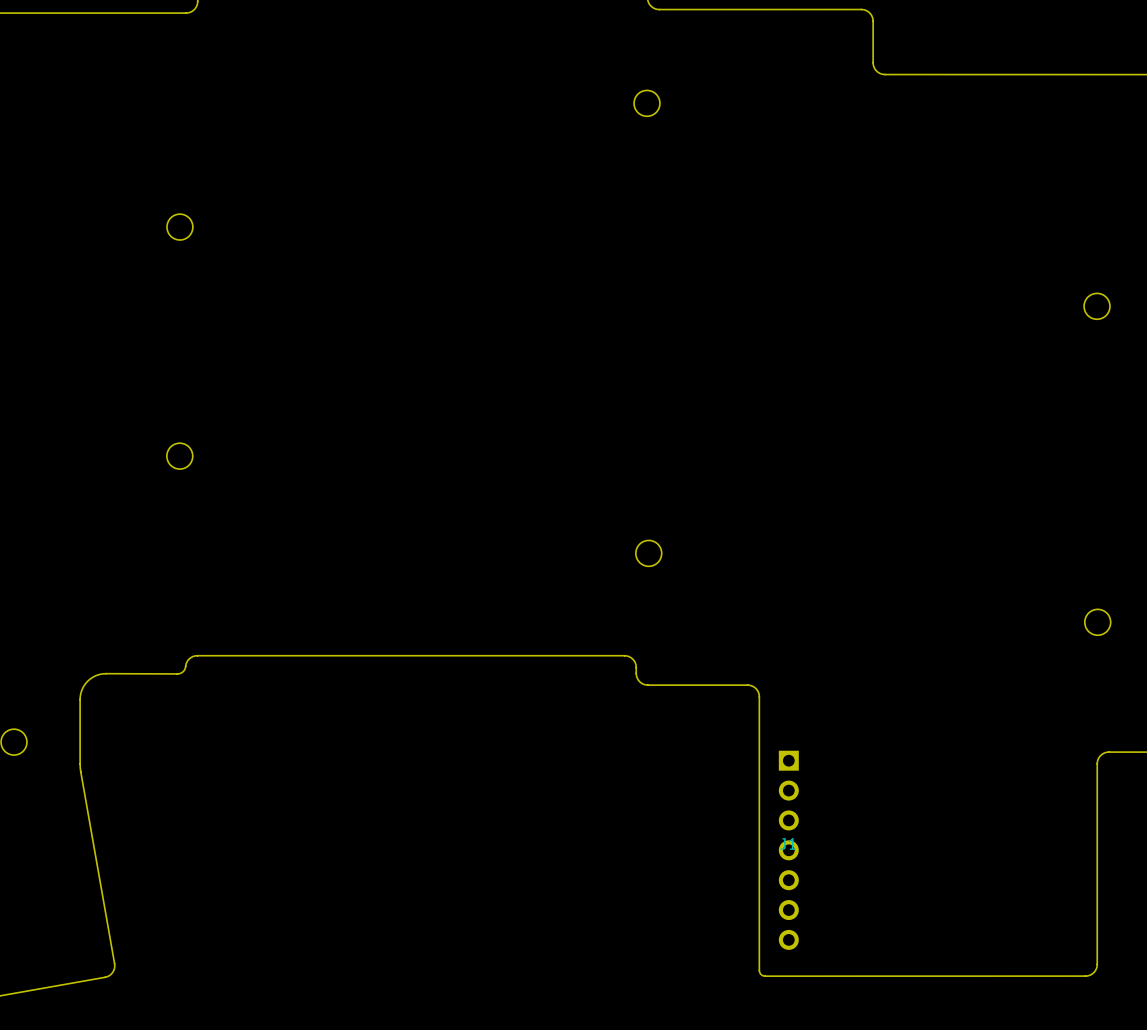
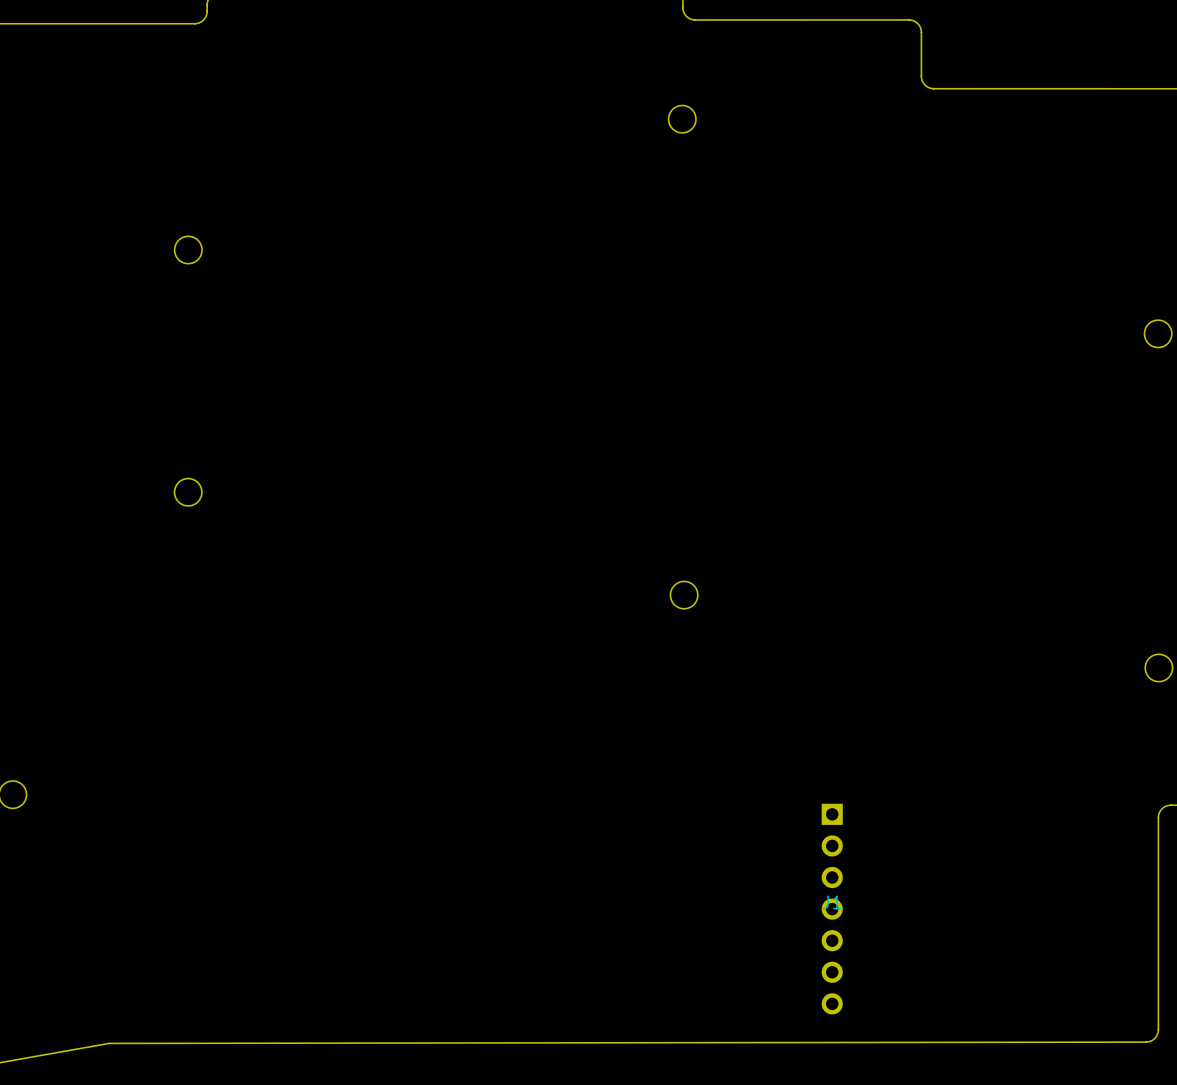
board edge: (114, 963) (80, 767) (80, 696) (84, 685) (92, 677) (105, 673) (179, 673) (184, 670) (189, 658) (197, 655) (624, 655) (633, 660) (637, 678) (645, 684) (748, 685) (758, 691) (759, 970) (761, 974) (1085, 976) -> (109, 1043) (1145, 1042)
board edge: (114, 963) (112, 972) (105, 977) -> none

